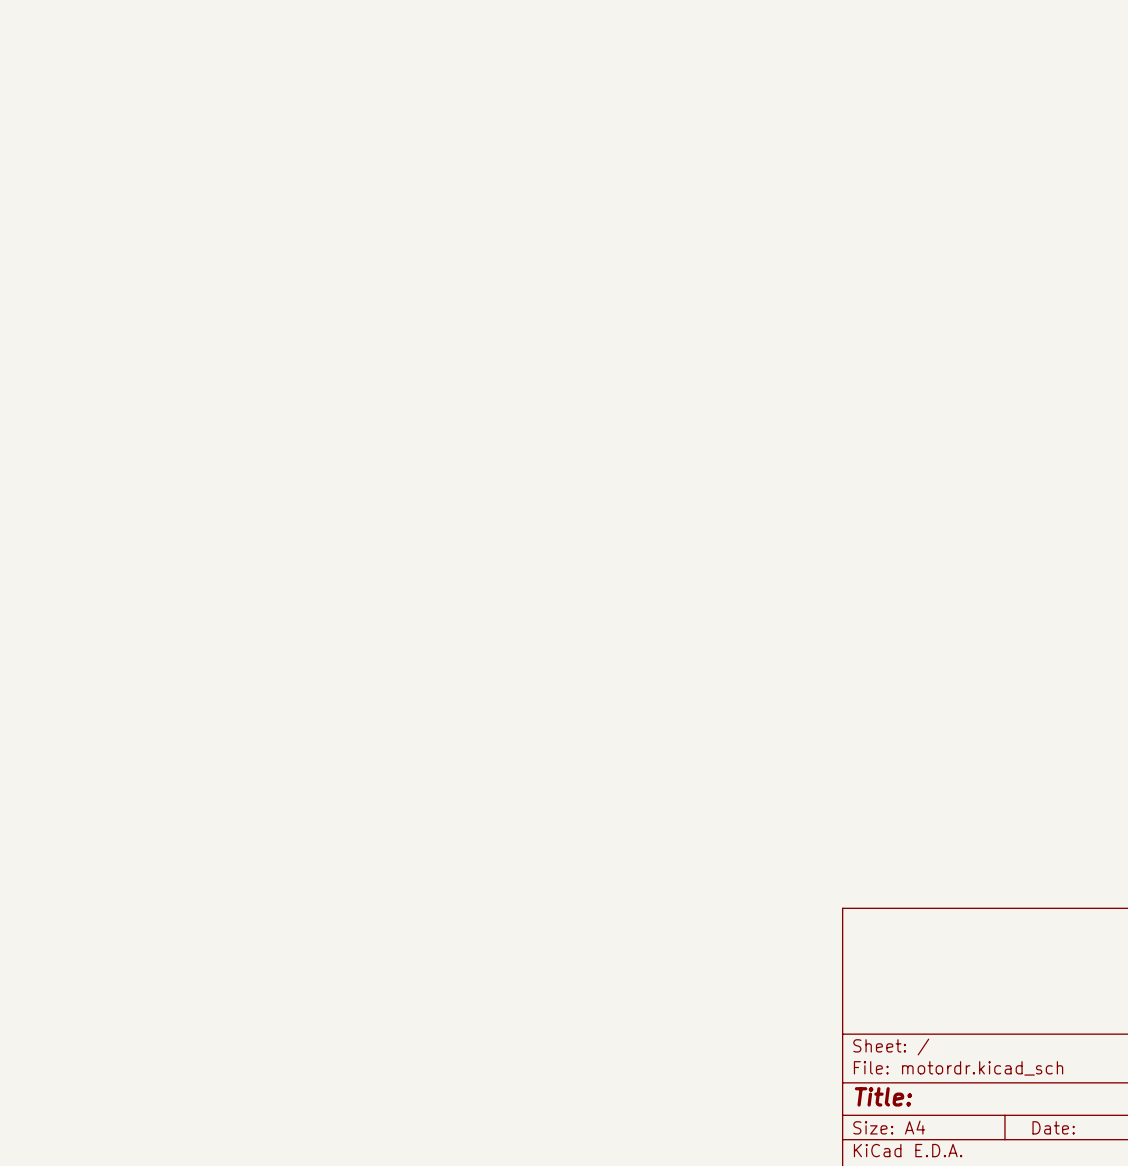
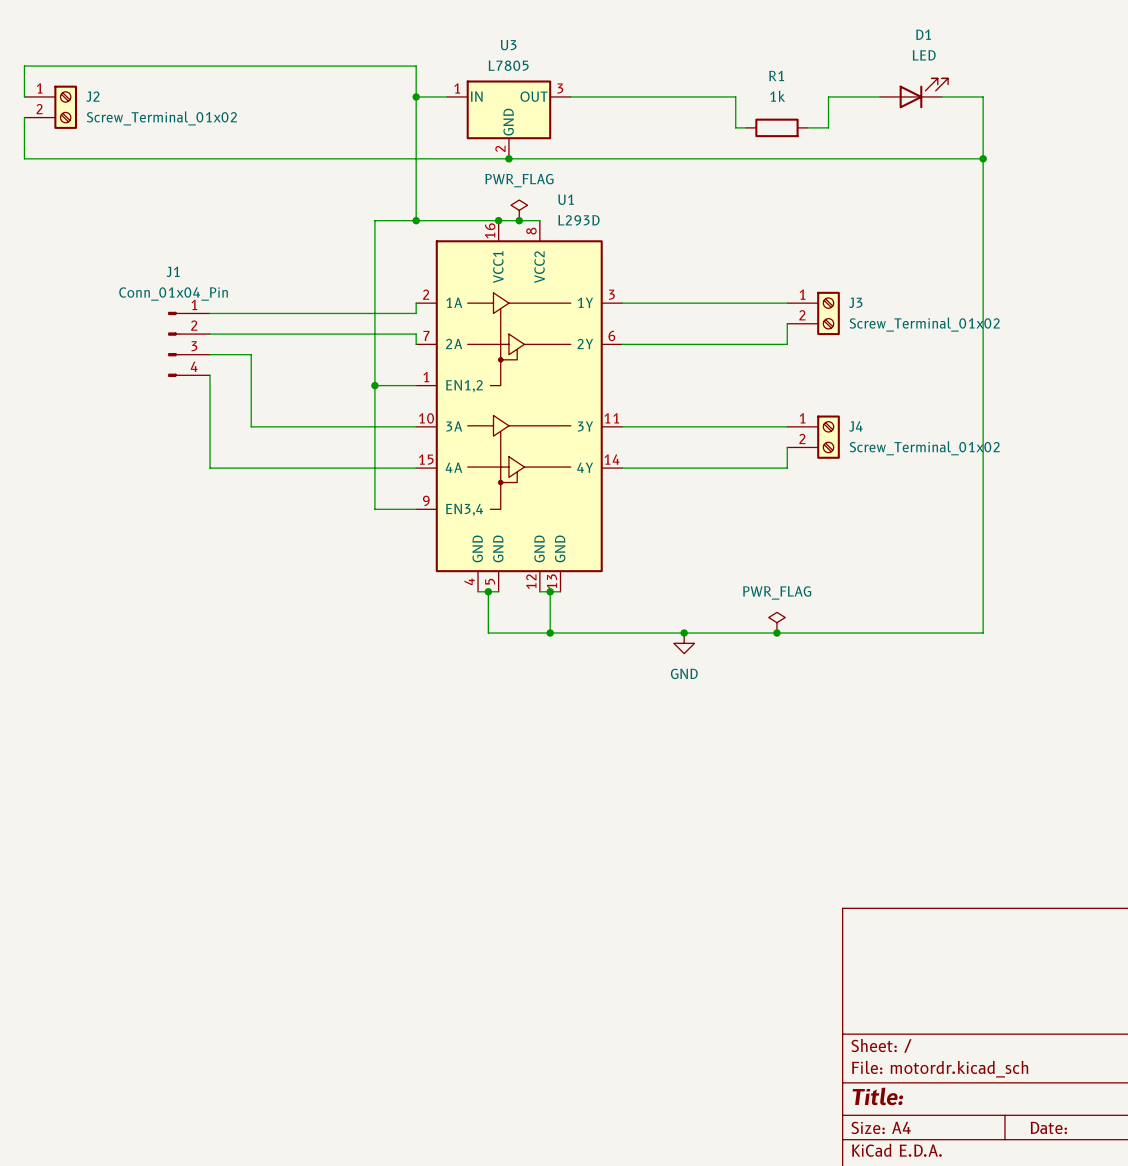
D1: none -> LED (914, 93)
wire: none -> (24, 96) (24, 66) (416, 66) (416, 220)
wire: none -> (416, 96) (447, 96)
junction: none -> (416, 96)
wire: none -> (570, 96) (735, 96) (735, 127) (746, 127)
wire: none -> (880, 96) (828, 96) (828, 127) (807, 127)
wire: none -> (941, 96) (983, 96) (983, 633) (488, 633) (488, 591)
J2: none -> Screw_Terminal_01x02 (50, 107)
wire: none -> (24, 117) (24, 158) (983, 158)
U3: none -> L7805 (508, 119)
R1: none -> 1k (776, 127)
junction: none -> (508, 158)
junction: none -> (983, 158)
power symbol: none -> PWR_FLAG (519, 210)
junction: none -> (416, 220)
junction: none -> (498, 220)
junction: none -> (519, 220)
wire: none -> (539, 220) (374, 220) (374, 509) (416, 509)
wire: none -> (416, 303) (416, 313) (210, 313)
wire: none -> (622, 303) (787, 303)
J3: none -> Screw_Terminal_01x02 (813, 313)
wire: none -> (787, 323) (787, 344) (622, 344)
wire: none -> (210, 334) (416, 334) (416, 344)
J1: none -> Conn_01x04_Pin (189, 344)
wire: none -> (210, 354) (251, 354) (251, 426) (416, 426)
wire: none -> (210, 375) (210, 468) (416, 468)
wire: none -> (374, 385) (416, 385)
junction: none -> (374, 385)
U1: none -> L293D (519, 406)
wire: none -> (622, 426) (787, 426)
J4: none -> Screw_Terminal_01x02 (813, 437)
wire: none -> (787, 447) (787, 468) (622, 468)
wire: none -> (478, 591) (498, 591)
junction: none -> (488, 591)
wire: none -> (539, 591) (560, 591)
wire: none -> (550, 591) (550, 633)
junction: none -> (550, 591)
power symbol: none -> PWR_FLAG (776, 622)
junction: none -> (550, 633)
junction: none -> (684, 633)
junction: none -> (776, 633)
power symbol: none -> GND (684, 643)

